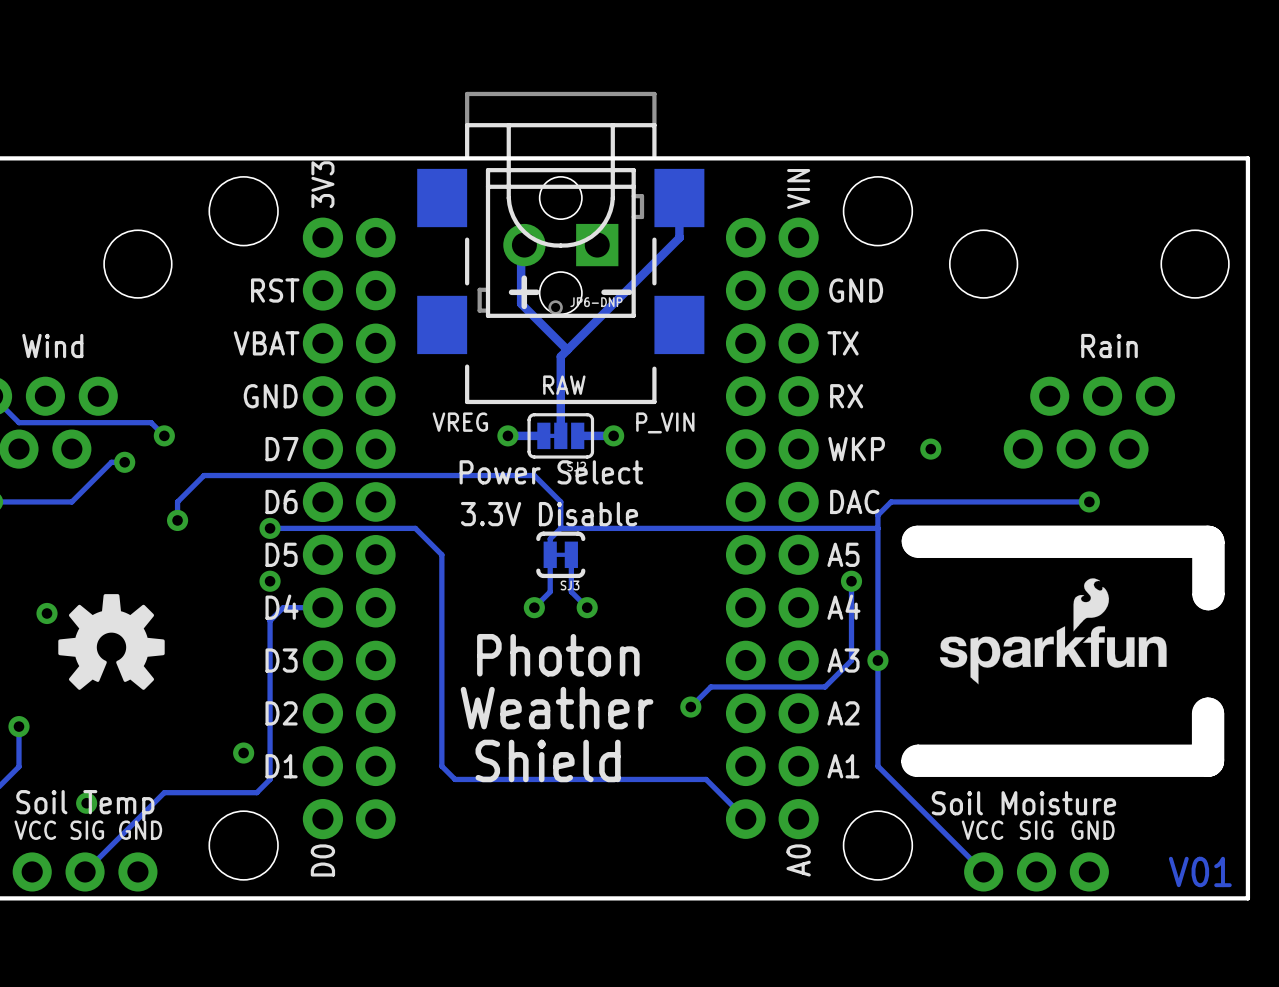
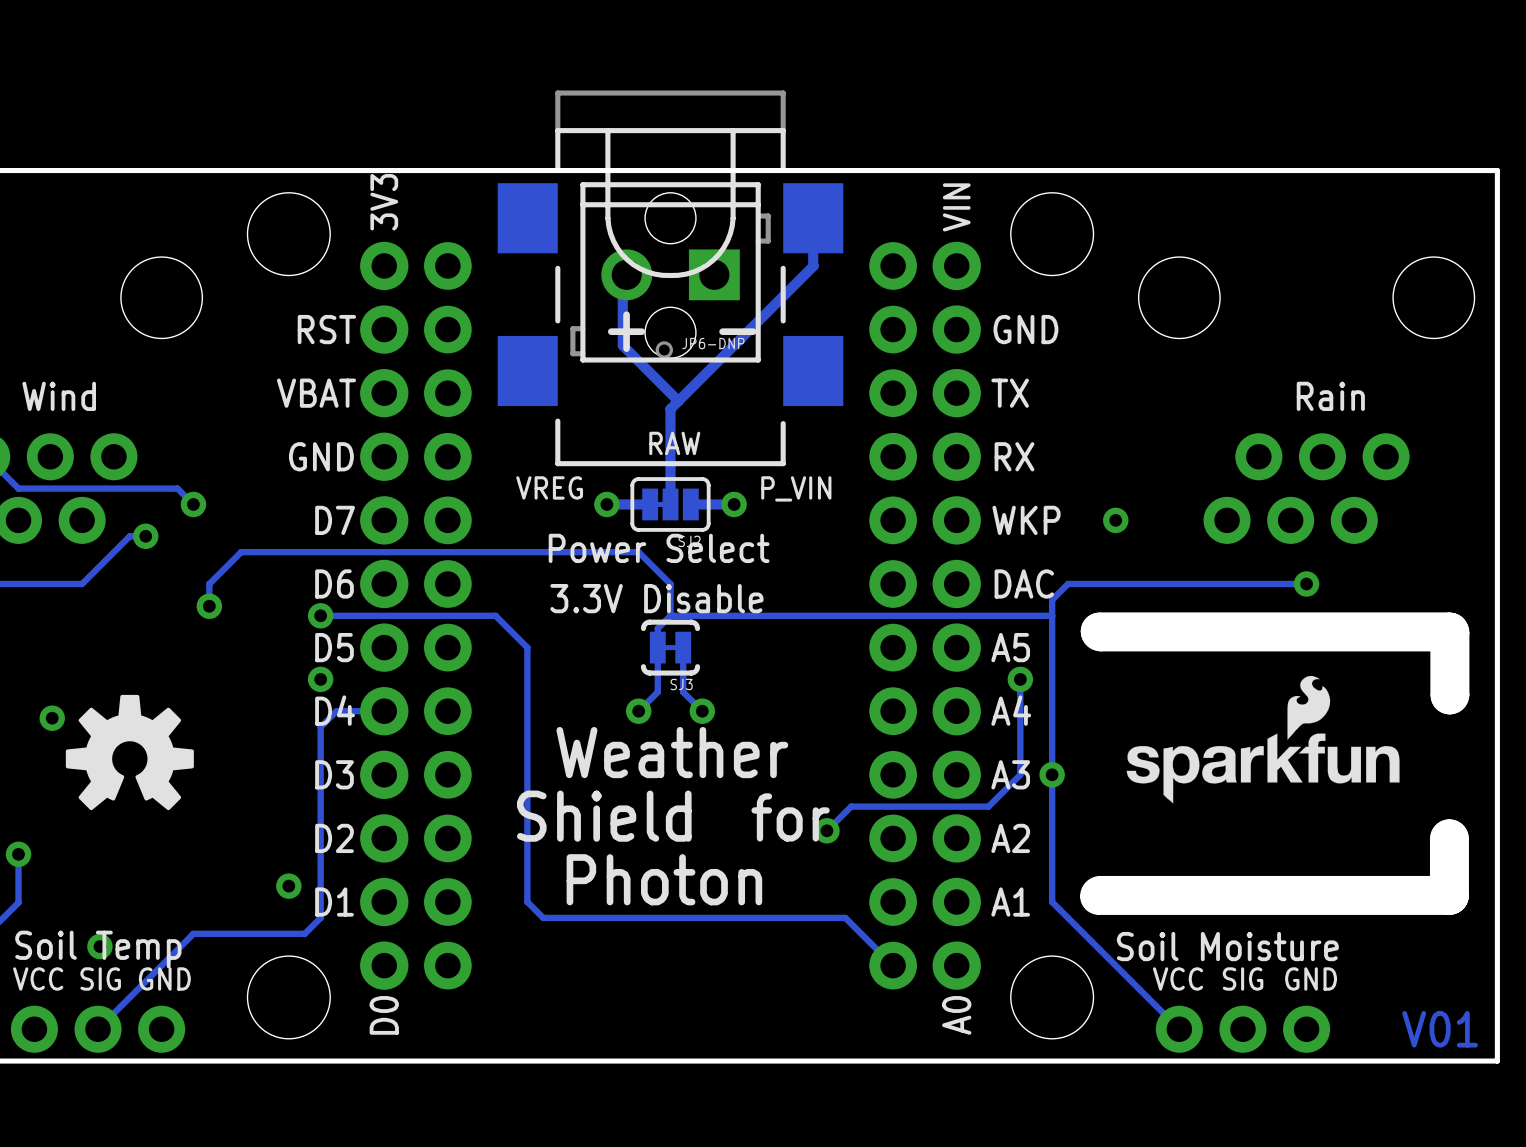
text position: Photon (558, 655) -> Photon (664, 879)
text: none -> for (790, 817)
text position: Weather (557, 708) -> Weather (672, 752)
text position: Shield (548, 760) -> Shield (604, 816)

